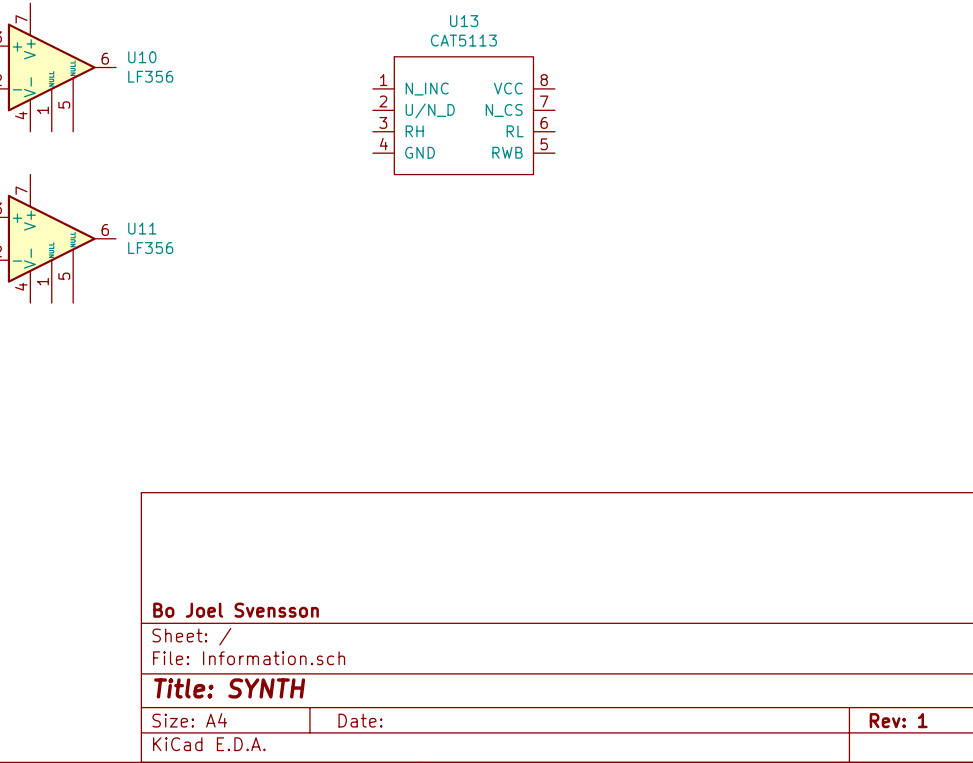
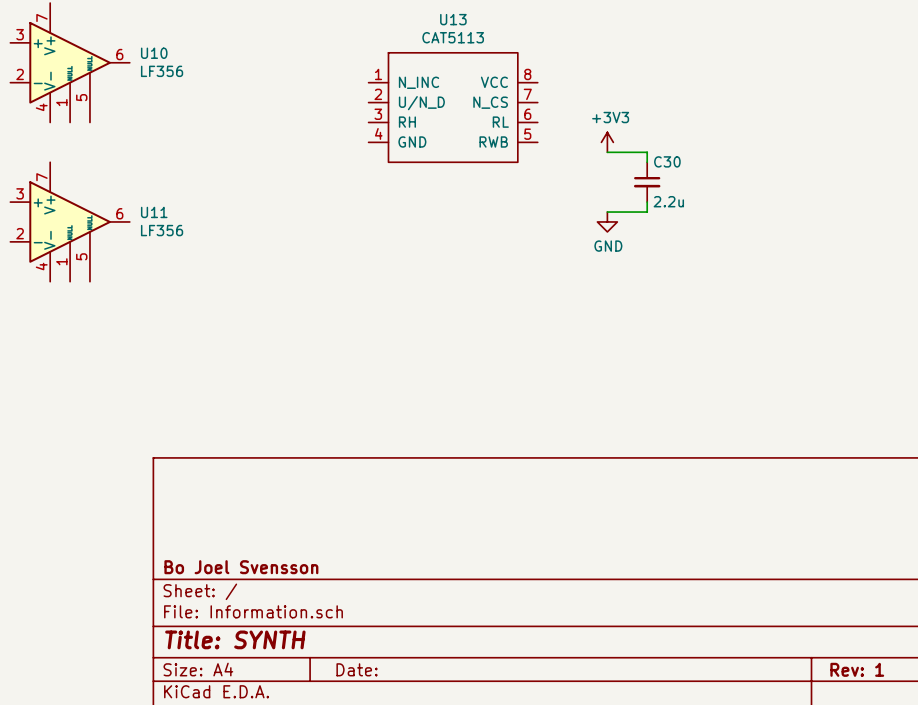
power symbol: none -> +3V3 (607, 142)
wire: none -> (607, 152) (647, 152) (647, 162)
C30: none -> 2.2u (647, 182)
wire: none -> (647, 202) (647, 212) (607, 212)
power symbol: none -> GND (607, 221)

